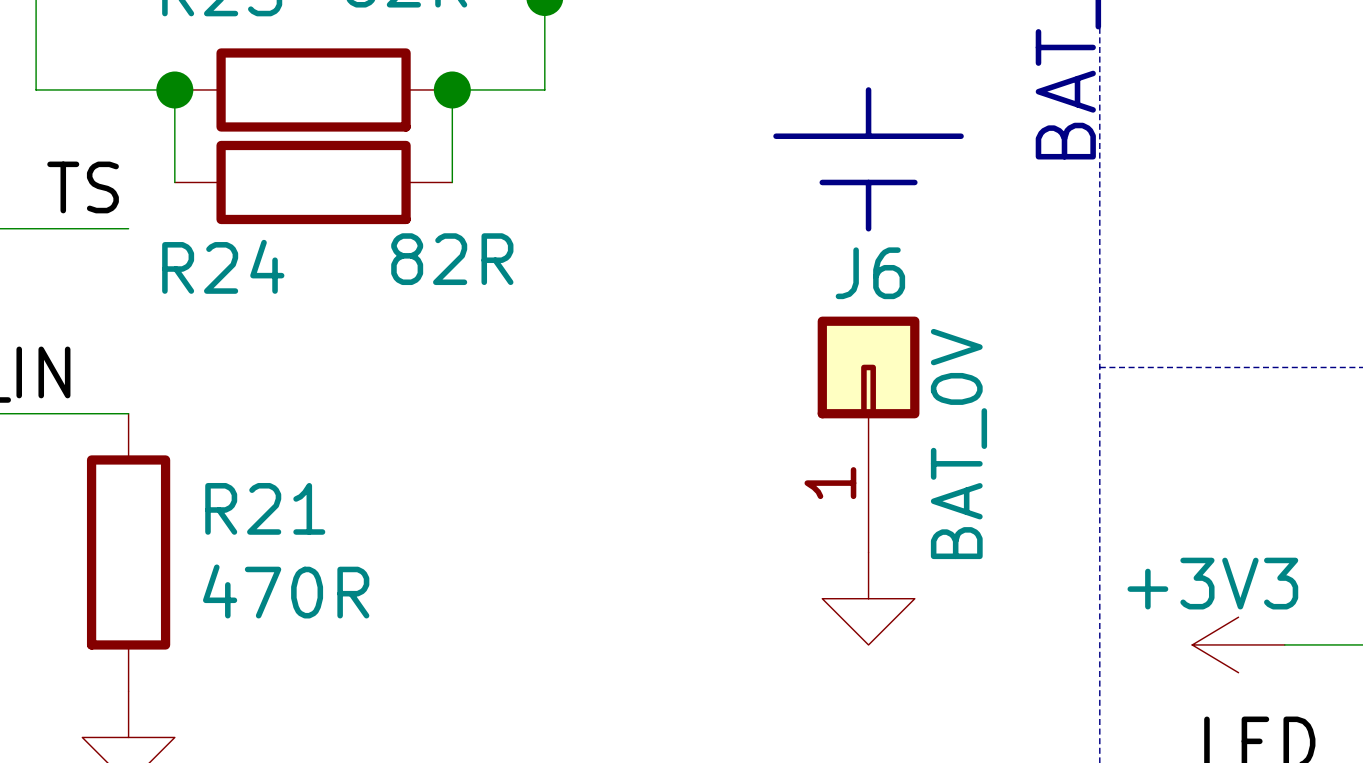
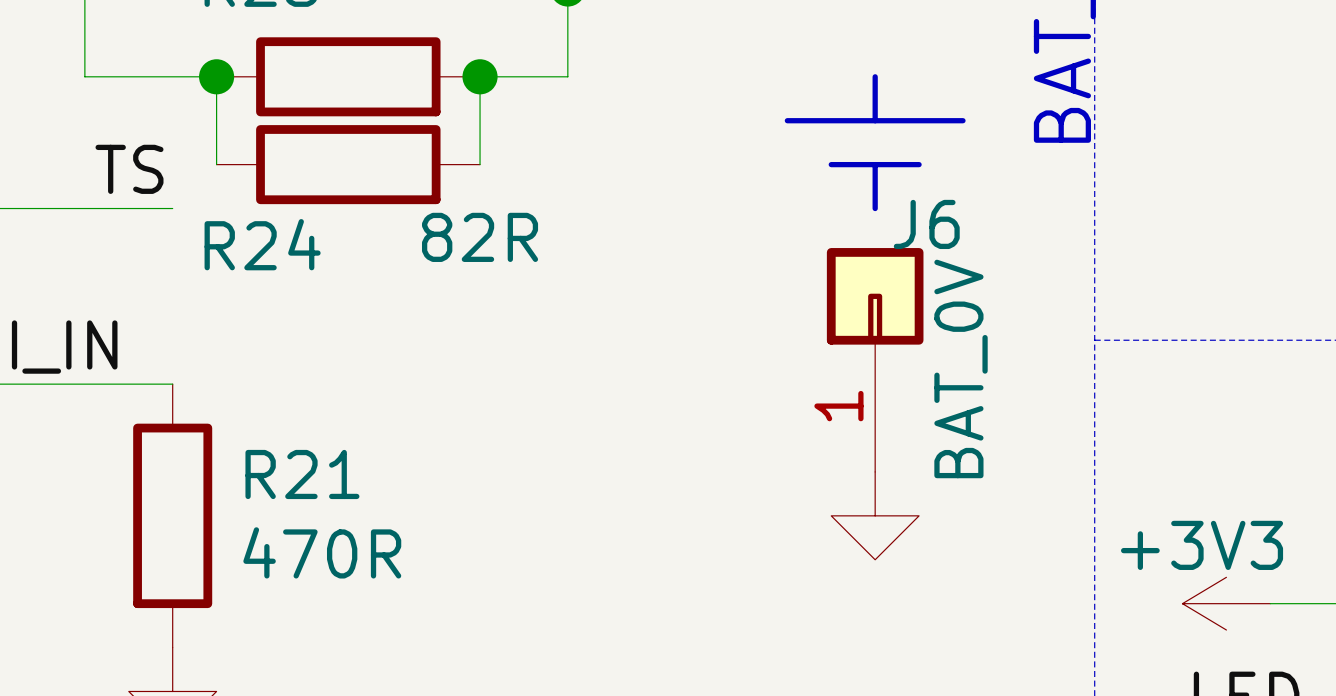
J6 name position: J6 (870, 273) -> J6 (926, 224)
J6 position: (868, 434) -> (875, 359)
power symbol position: (868, 598) -> (875, 515)

